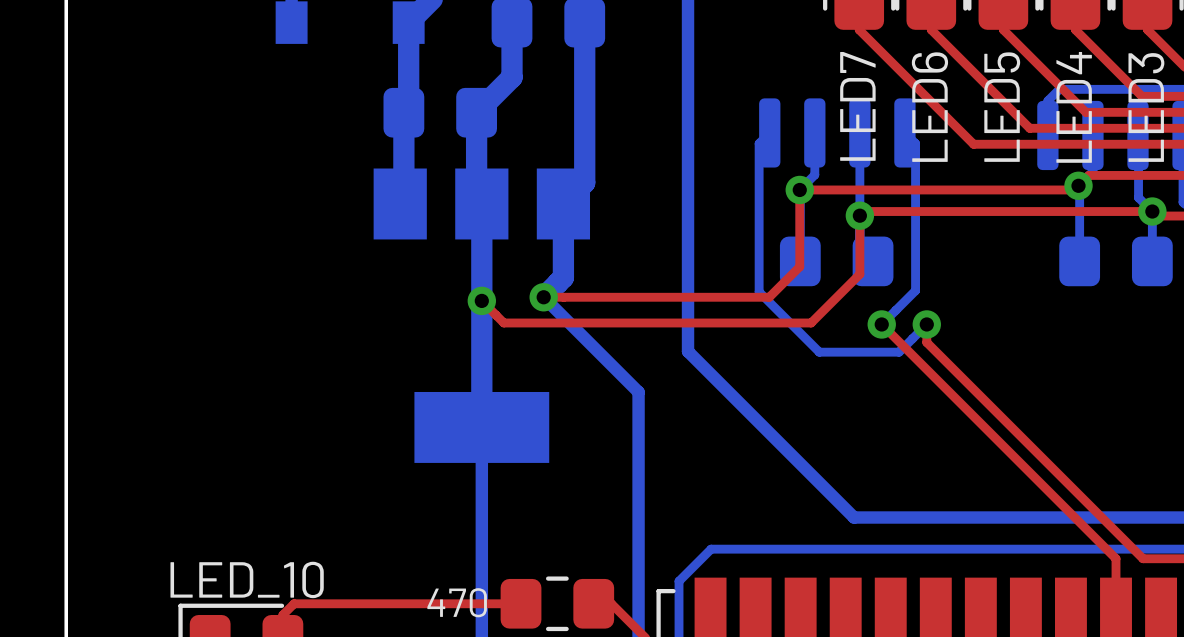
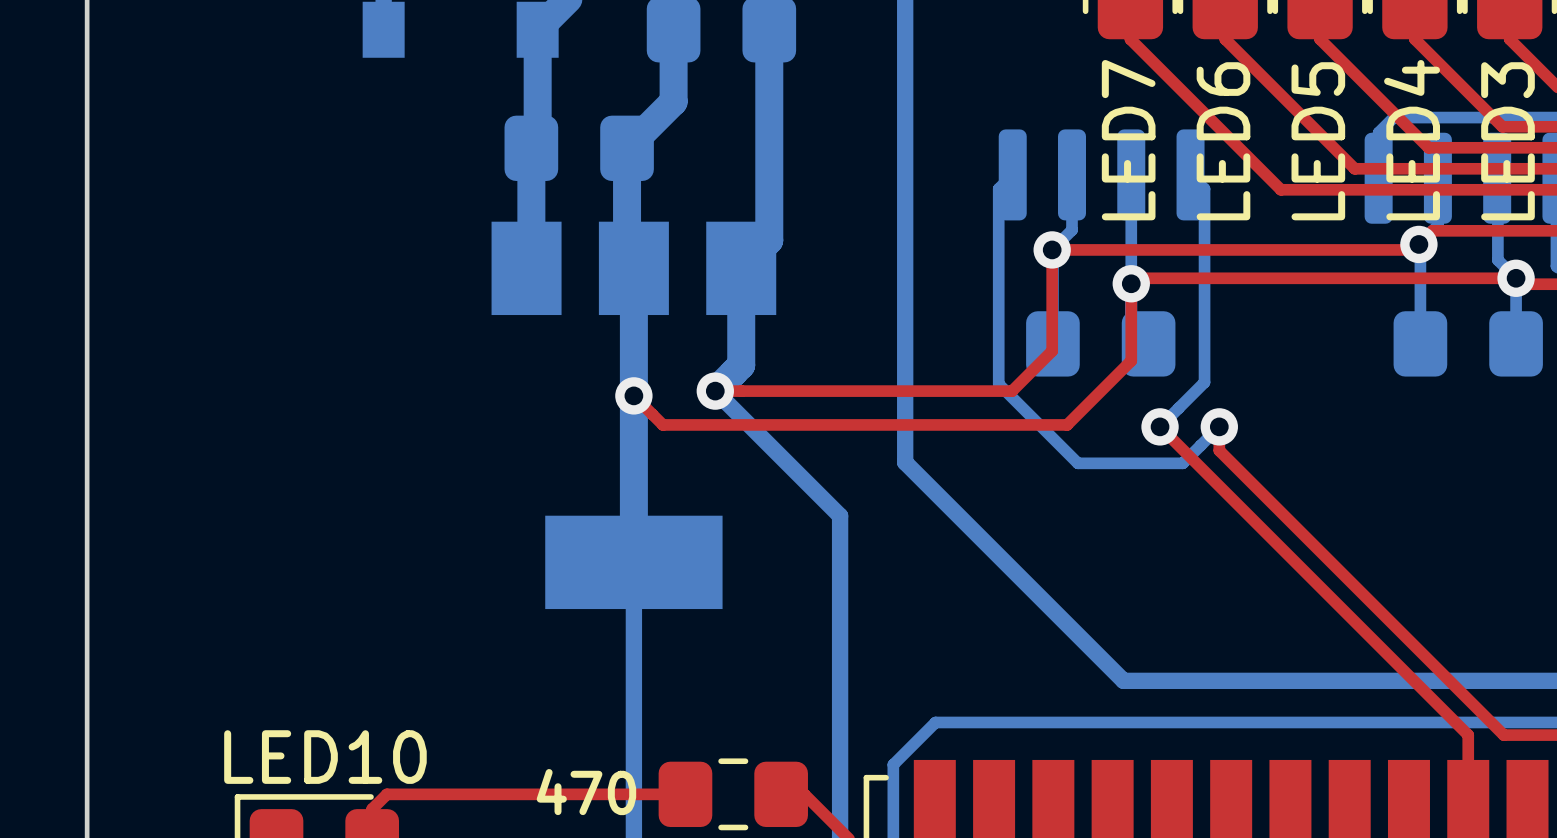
part value: LED_10 (247, 579) -> LED10 (325, 757)

